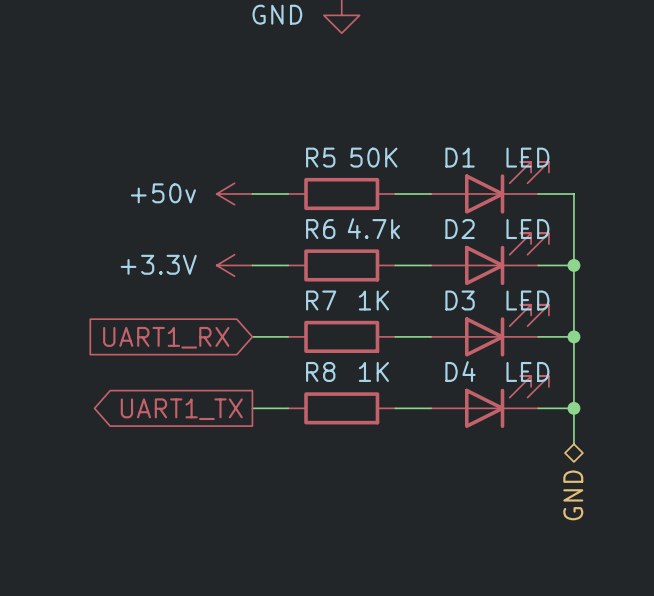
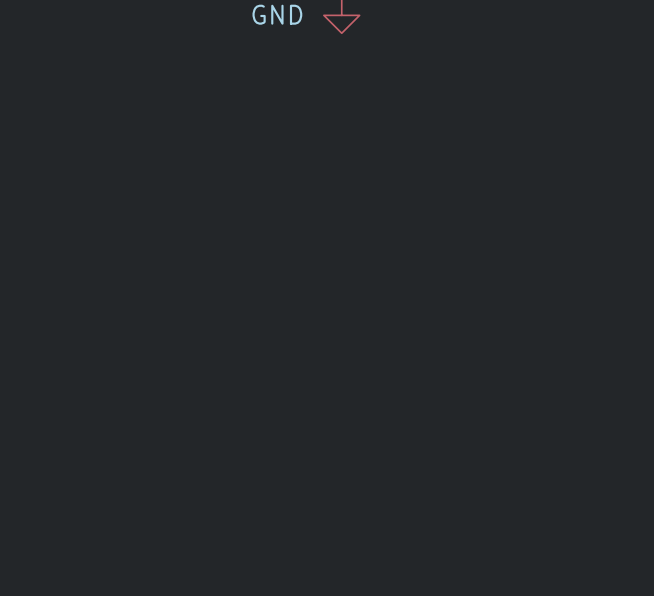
D1: LED (490, 187) -> none
power symbol: +50v (234, 194) -> none
wire: (252, 194) (288, 194) -> none
R5: 50K (341, 194) -> none
wire: (395, 194) (431, 194) -> none
wire: (538, 194) (573, 194) (573, 444) -> none
D2: LED (490, 259) -> none
power symbol: +3.3V (234, 265) -> none
wire: (252, 265) (288, 265) -> none
R6: 4.7k (341, 265) -> none
wire: (395, 265) (431, 265) -> none
wire: (538, 265) (573, 265) -> none
junction: (573, 265) -> none
D3: LED (490, 330) -> none
wire: (252, 336) (288, 336) -> none
R7: 1K (341, 336) -> none
wire: (395, 336) (431, 336) -> none
wire: (538, 336) (573, 336) -> none
junction: (573, 336) -> none
global label: UART1_RX (166, 337) -> none
D4: LED (490, 402) -> none
wire: (252, 408) (288, 408) -> none
R8: 1K (341, 408) -> none
wire: (395, 408) (431, 408) -> none
wire: (538, 408) (573, 408) -> none
junction: (573, 408) -> none
global label: UART1_TX (181, 409) -> none
hierarchical label: GND (573, 495) -> none

